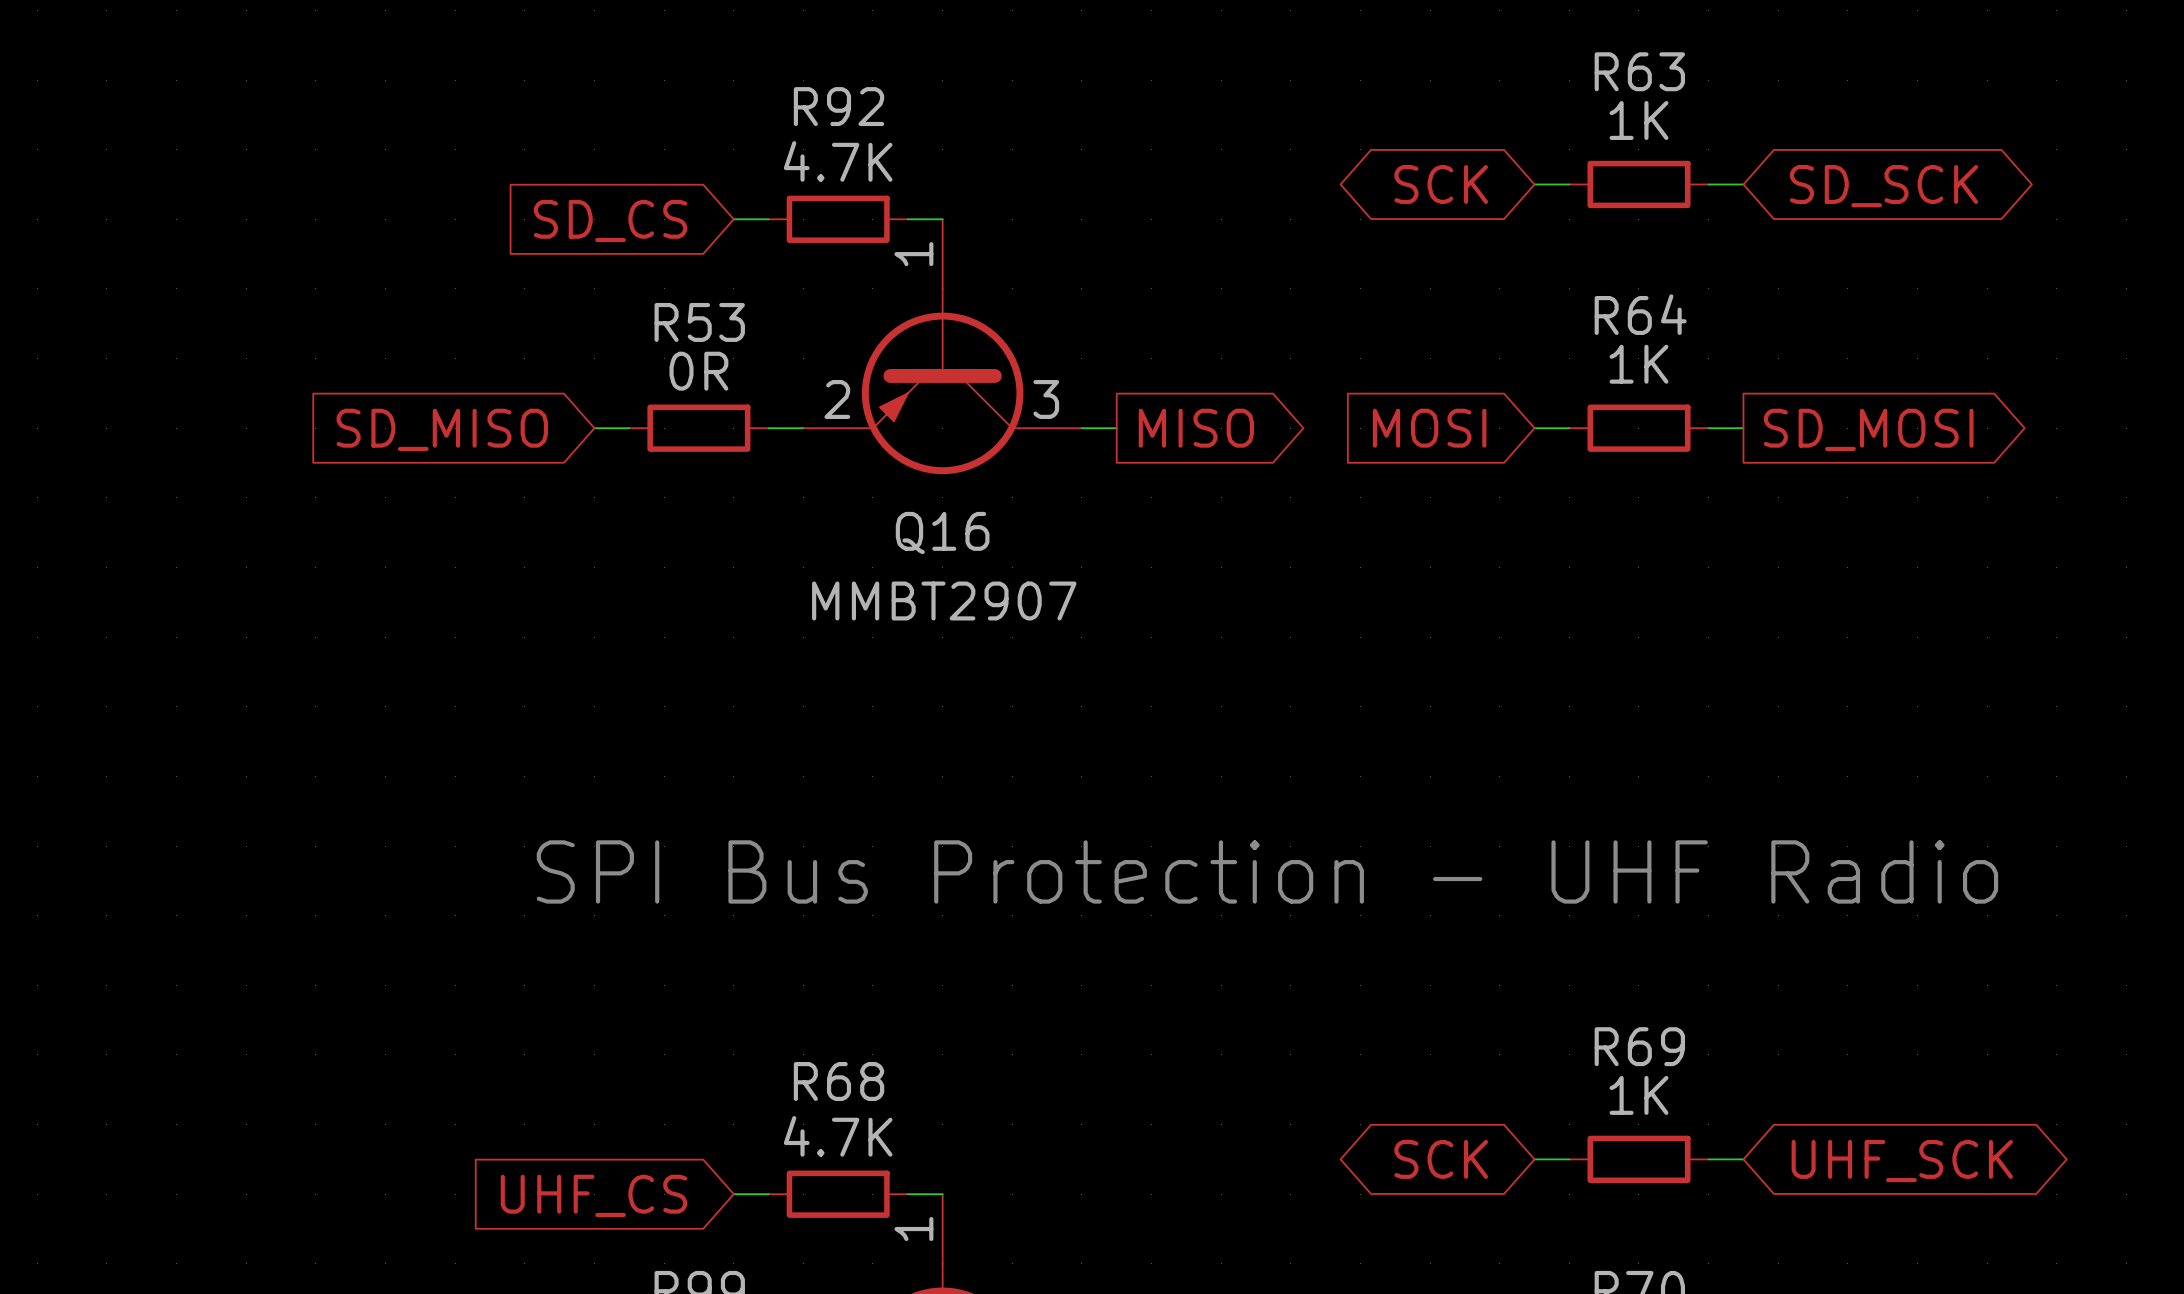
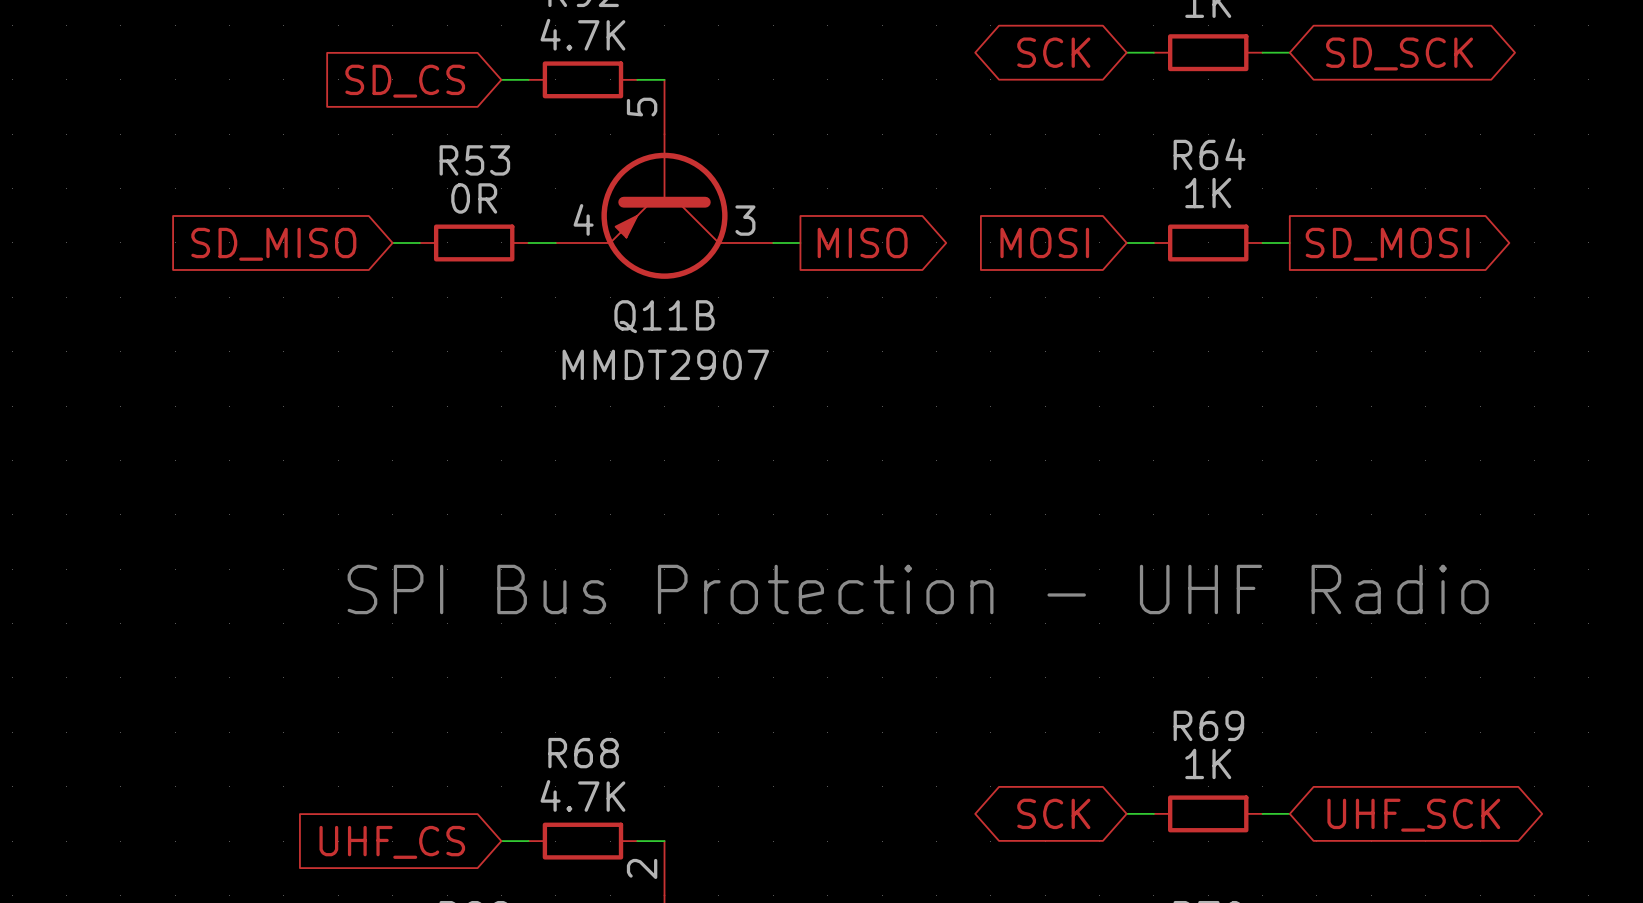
Q16 pin number: 1 (913, 254) -> 5 (642, 107)
Q16 pin number: 2 (837, 399) -> 4 (583, 219)
Q16 name: Q16 (942, 533) -> Q11B (664, 316)
Q16 value: MMBT2907 (944, 600) -> MMDT2907 (665, 364)
part pin number: 1 (913, 1229) -> 2 (642, 868)

